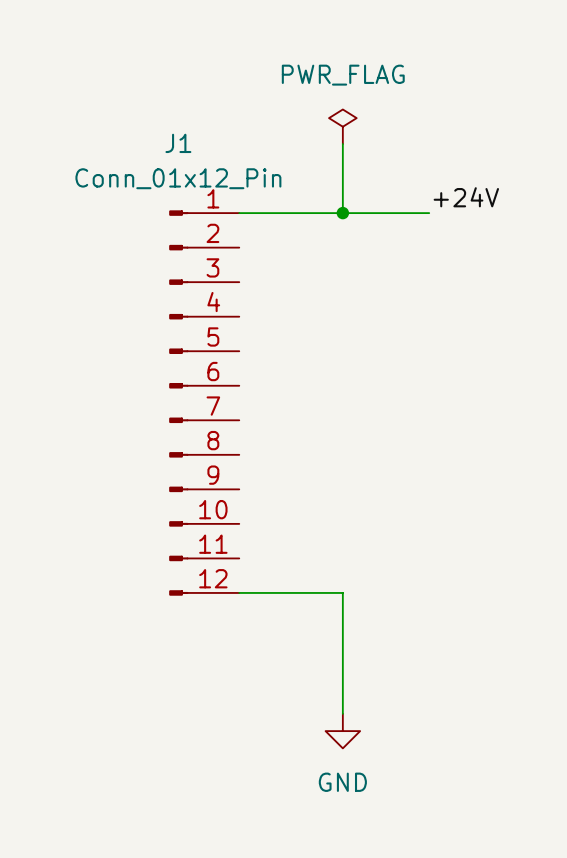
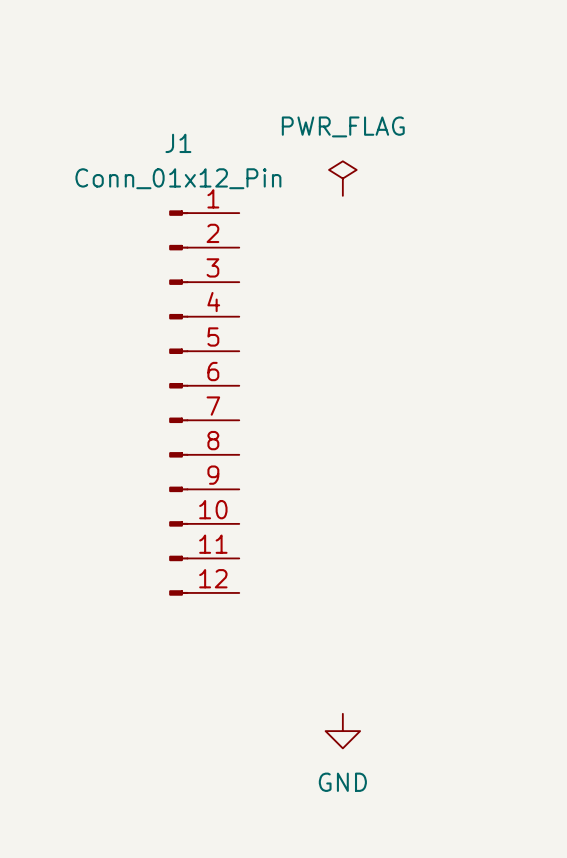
power symbol position: PWR_FLAG (342, 126) -> PWR_FLAG (342, 178)
wire: (342, 144) (342, 213) -> none
label: +24V (466, 197) -> none
wire: (239, 213) (429, 213) -> none
junction: (342, 213) -> none
wire: (239, 592) (342, 592) (342, 713) -> none

